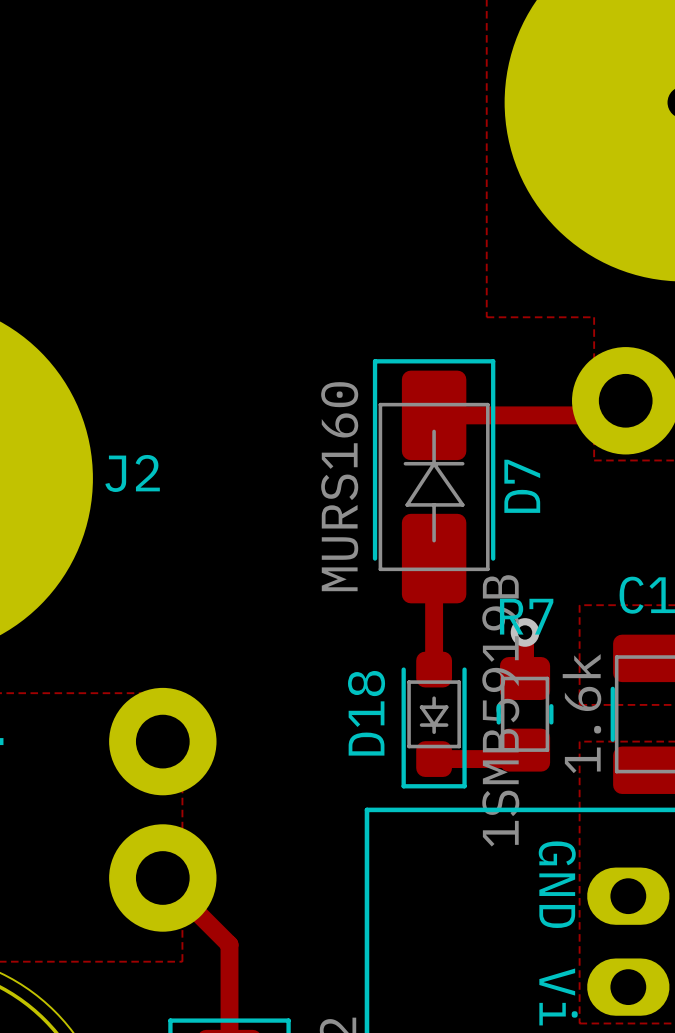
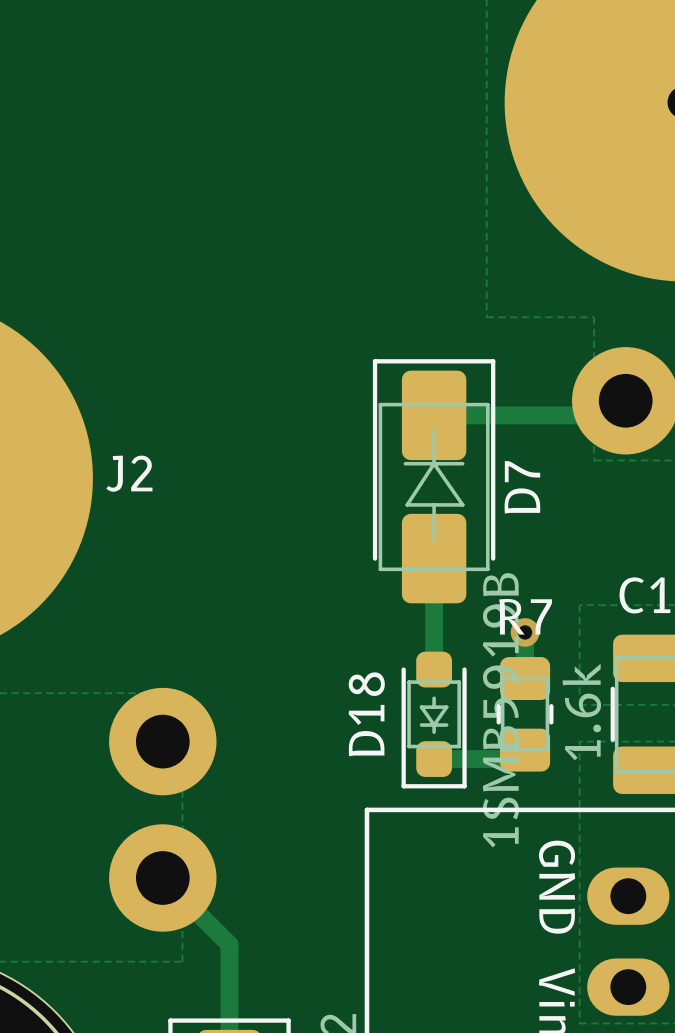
D7 value: MURS160 (339, 486) -> none

